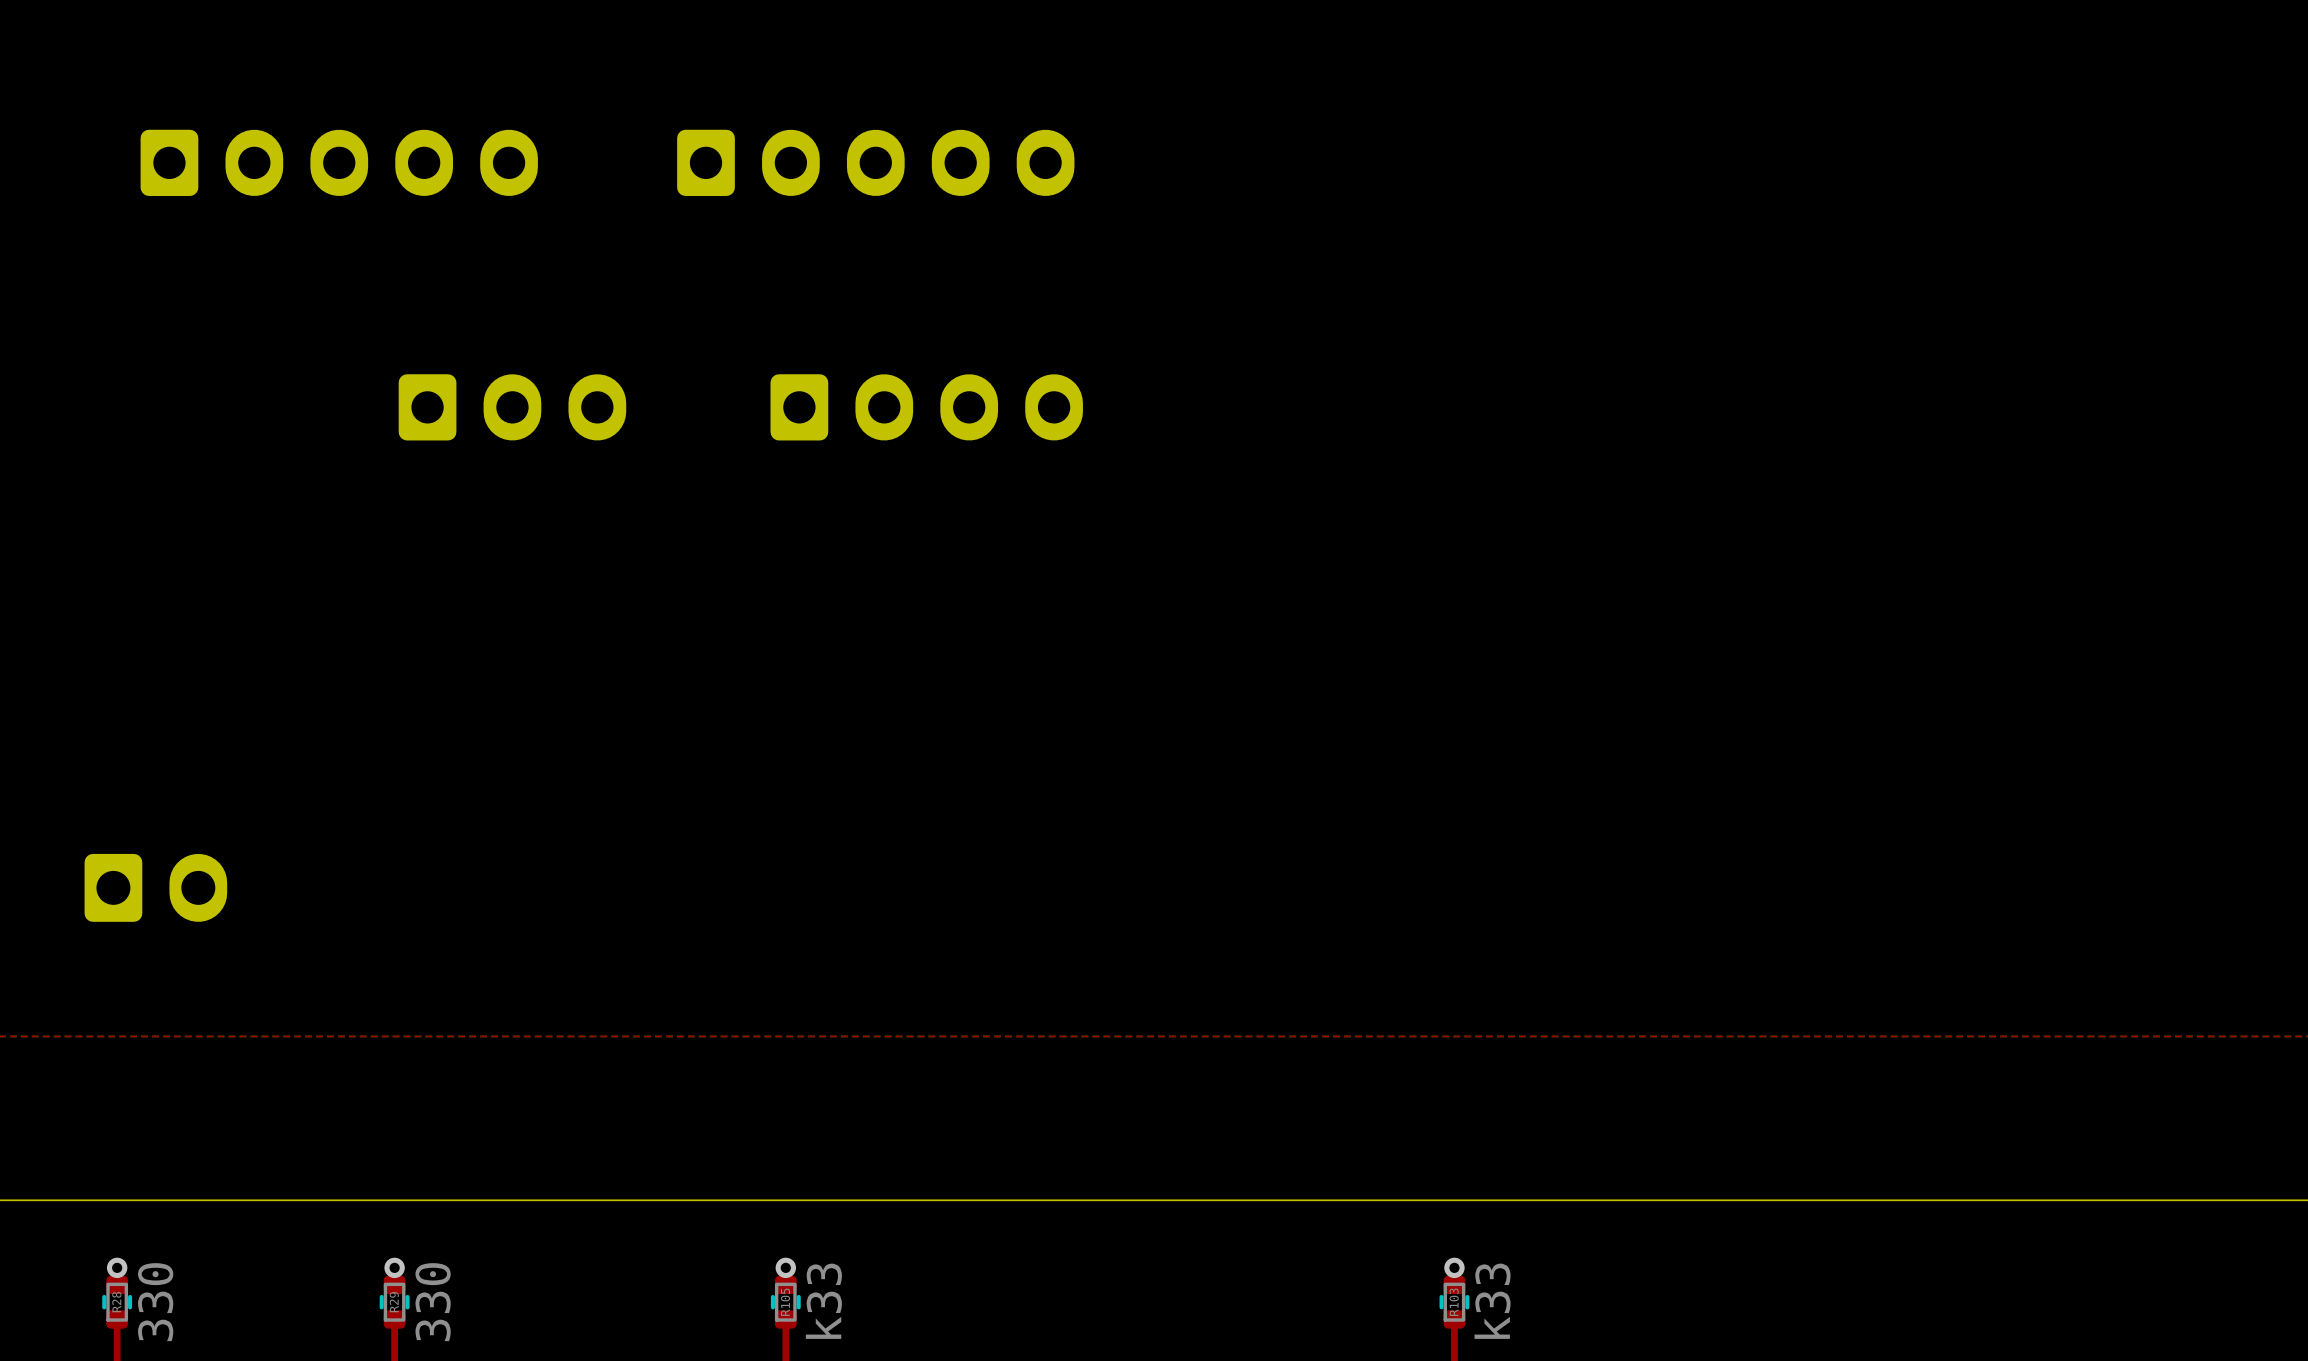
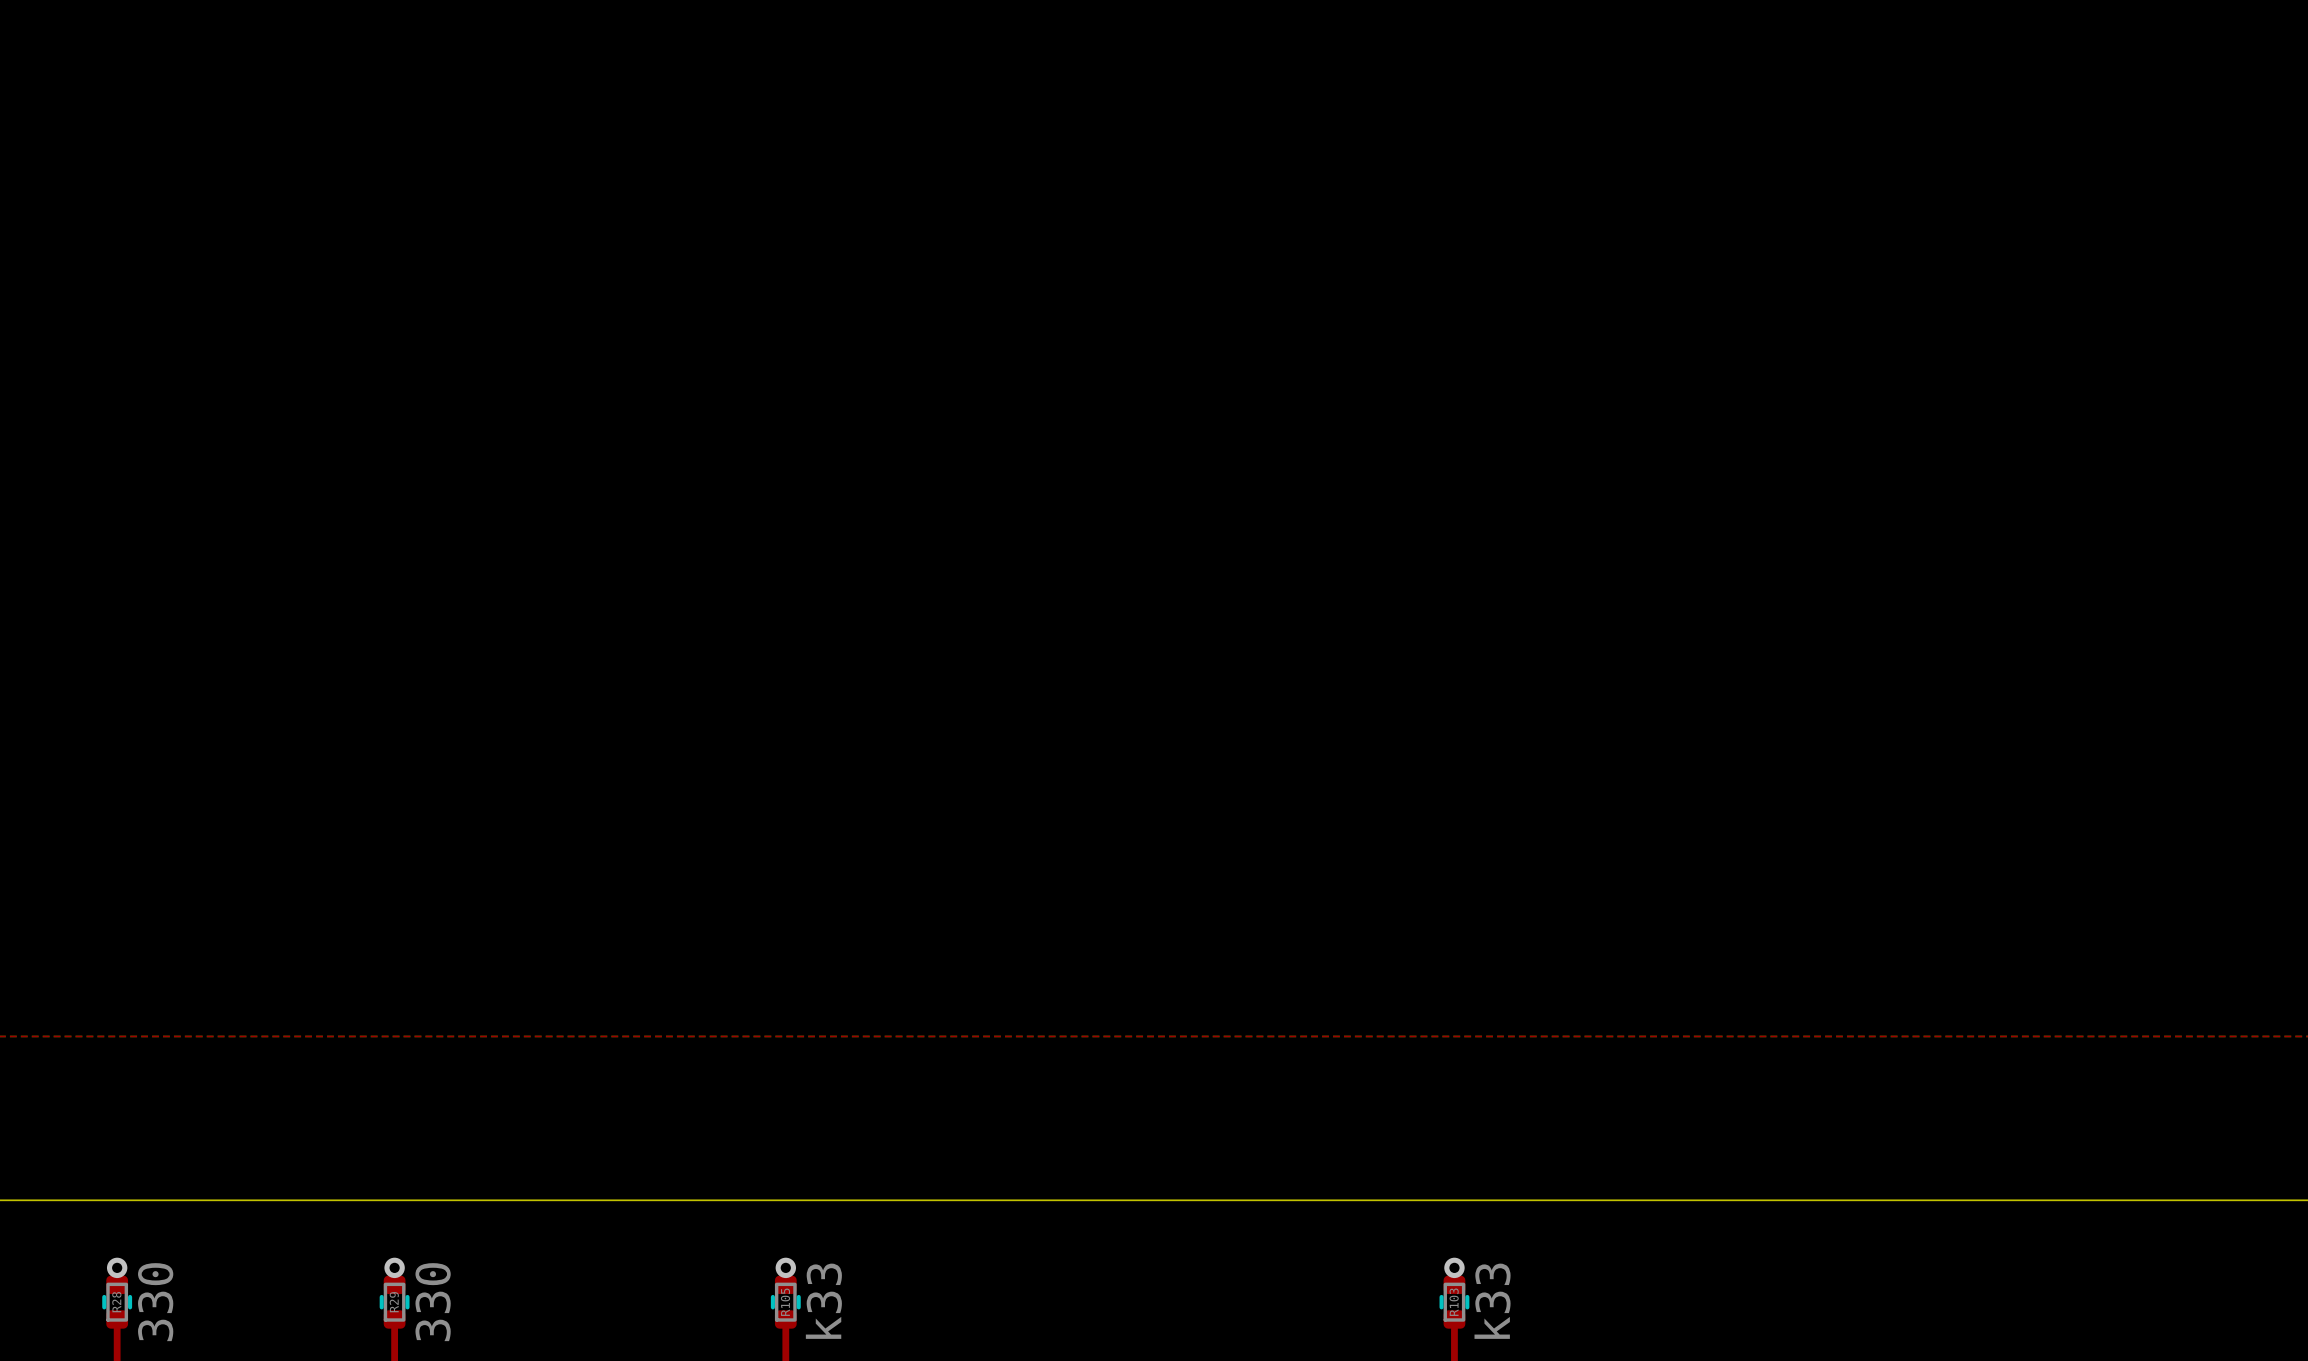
part: (339, 162) -> none
part: (875, 162) -> none
part: (512, 407) -> none
part: (926, 407) -> none
part: (155, 887) -> none

